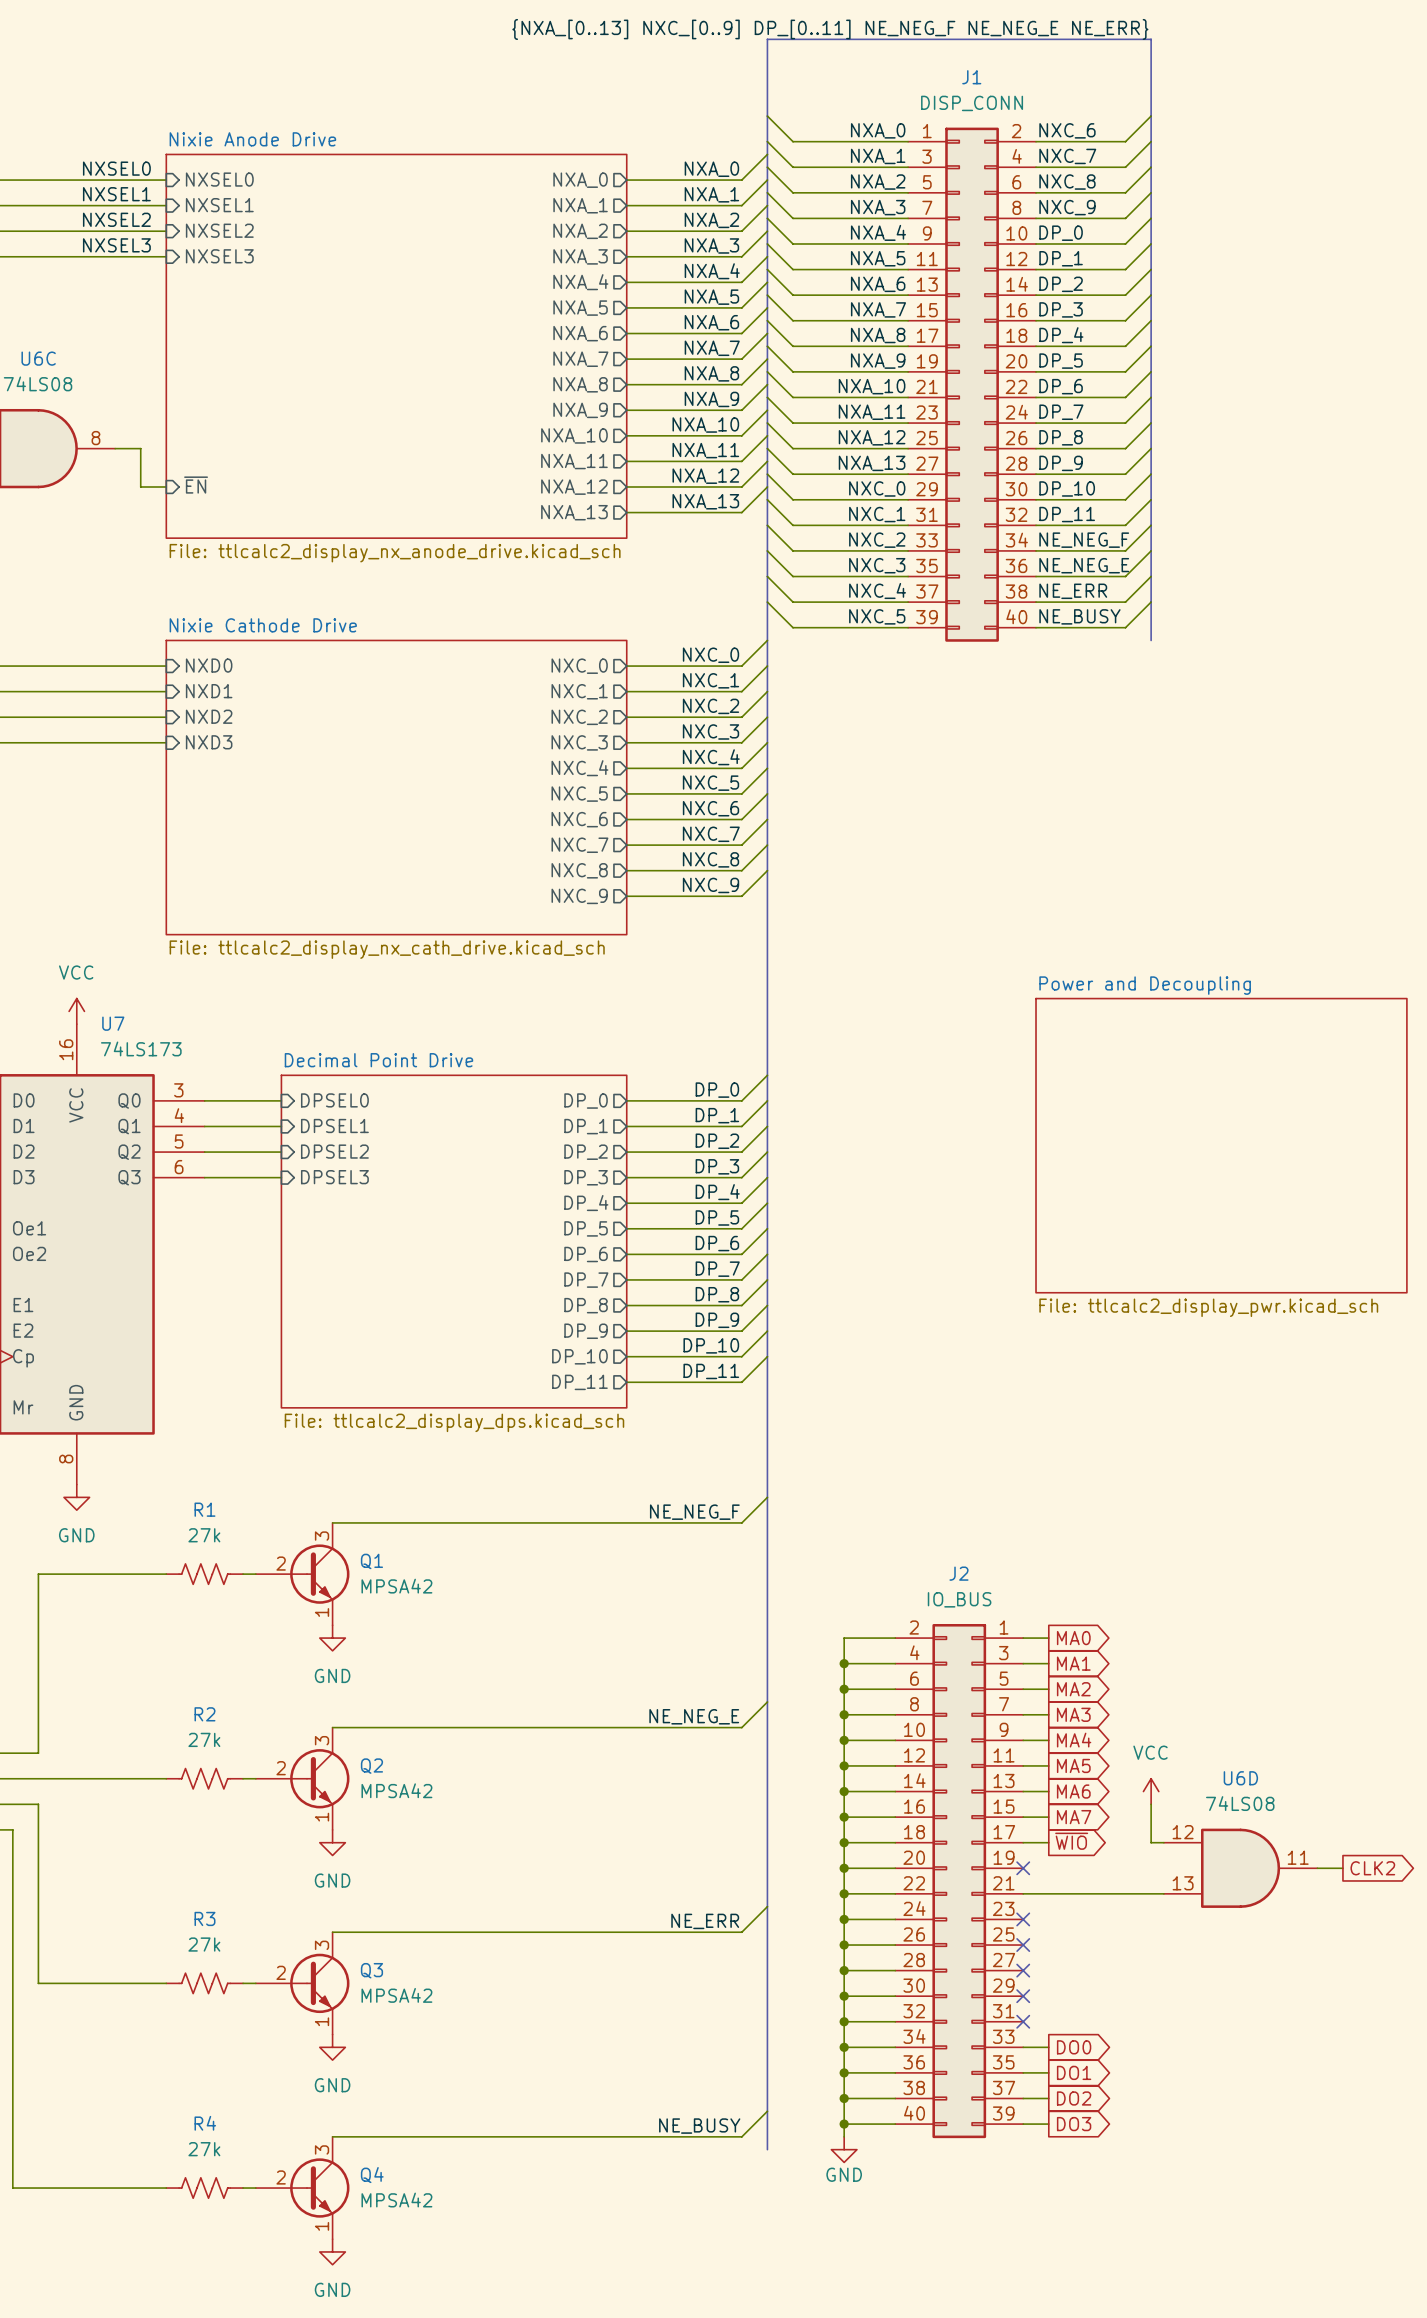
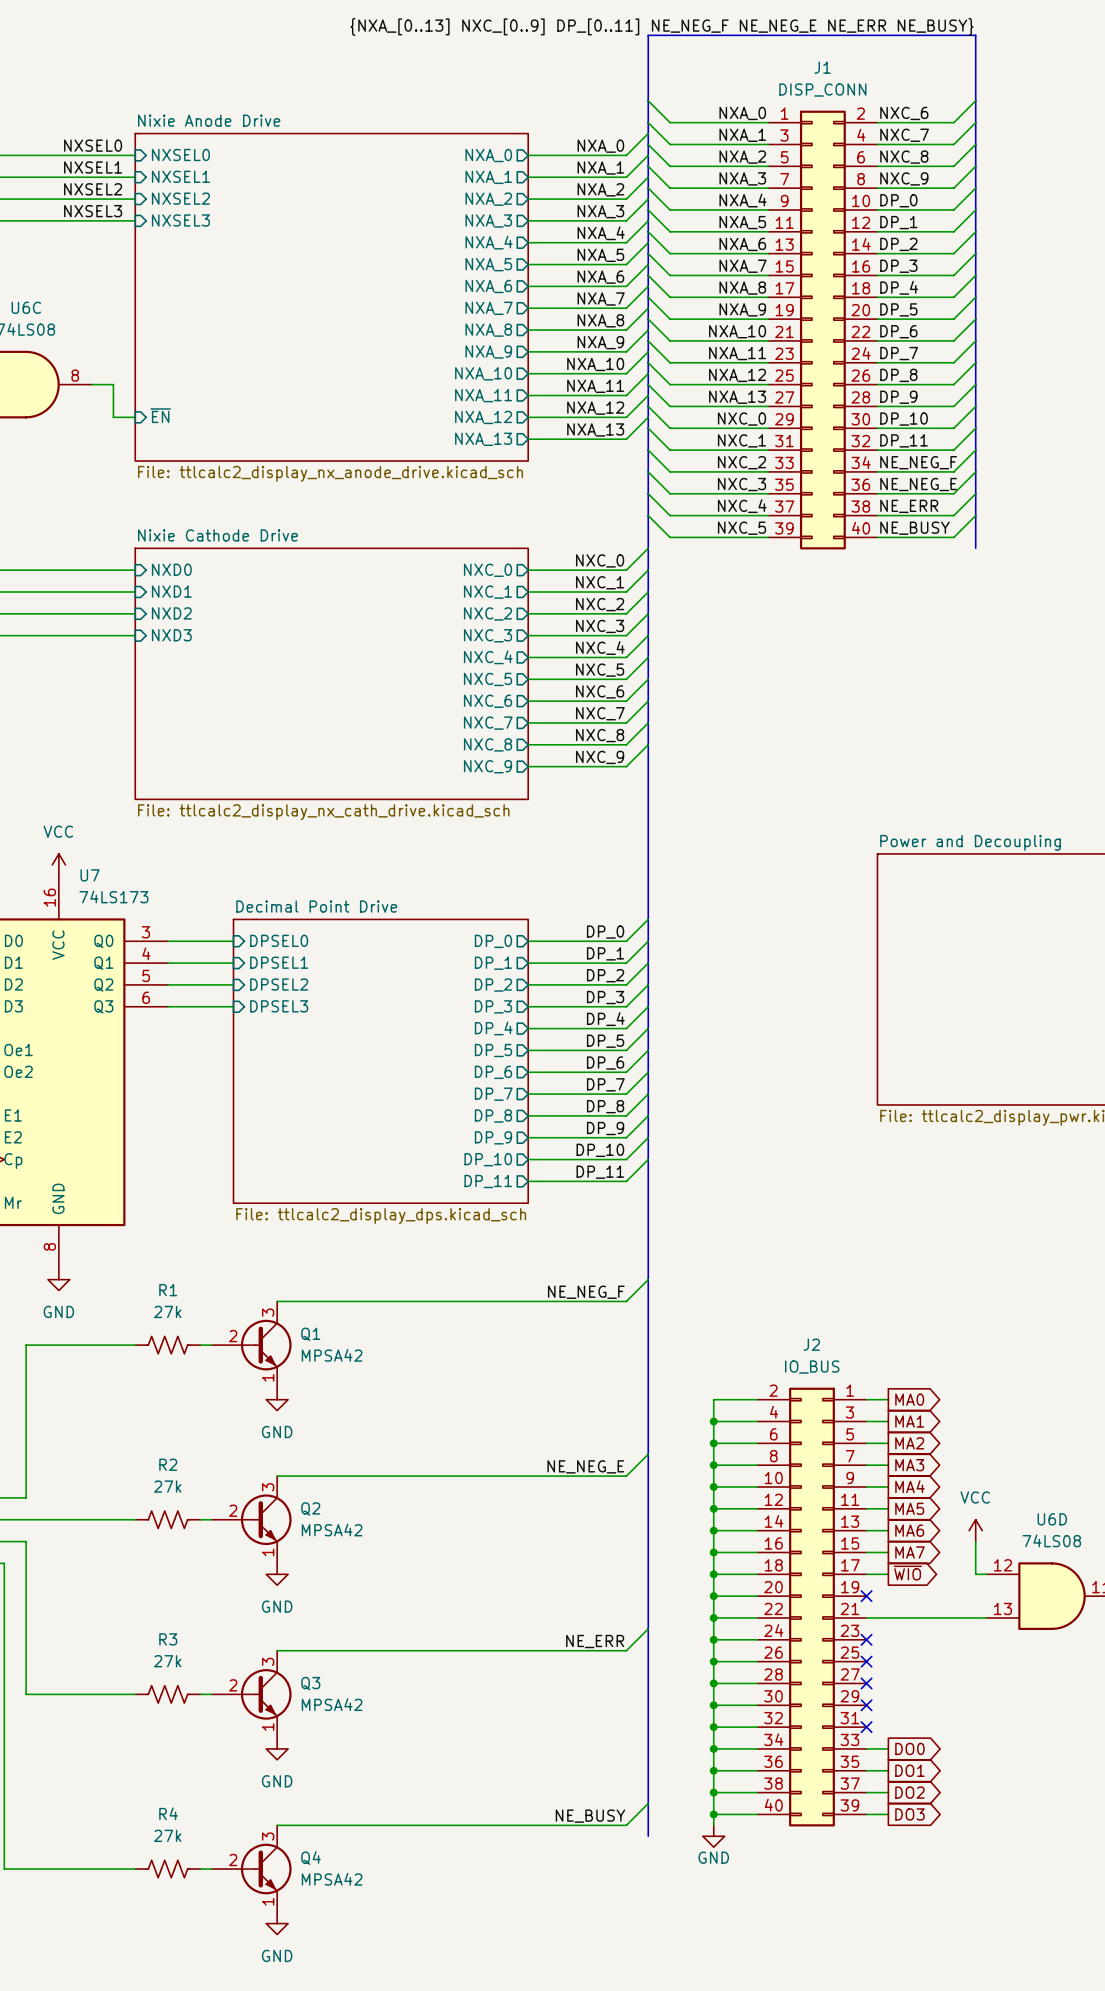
label: {NXA_[0..13] NXC_[0..9] DP_[0..11] NE_NEG_F NE_NEG_E NE_ERR} (830, 29) -> {NXA_[0..13] NXC_[0..9] DP_[0..11] NE_NEG_F NE_NEG_E NE_ERR NE_BUSY} (661, 26)

